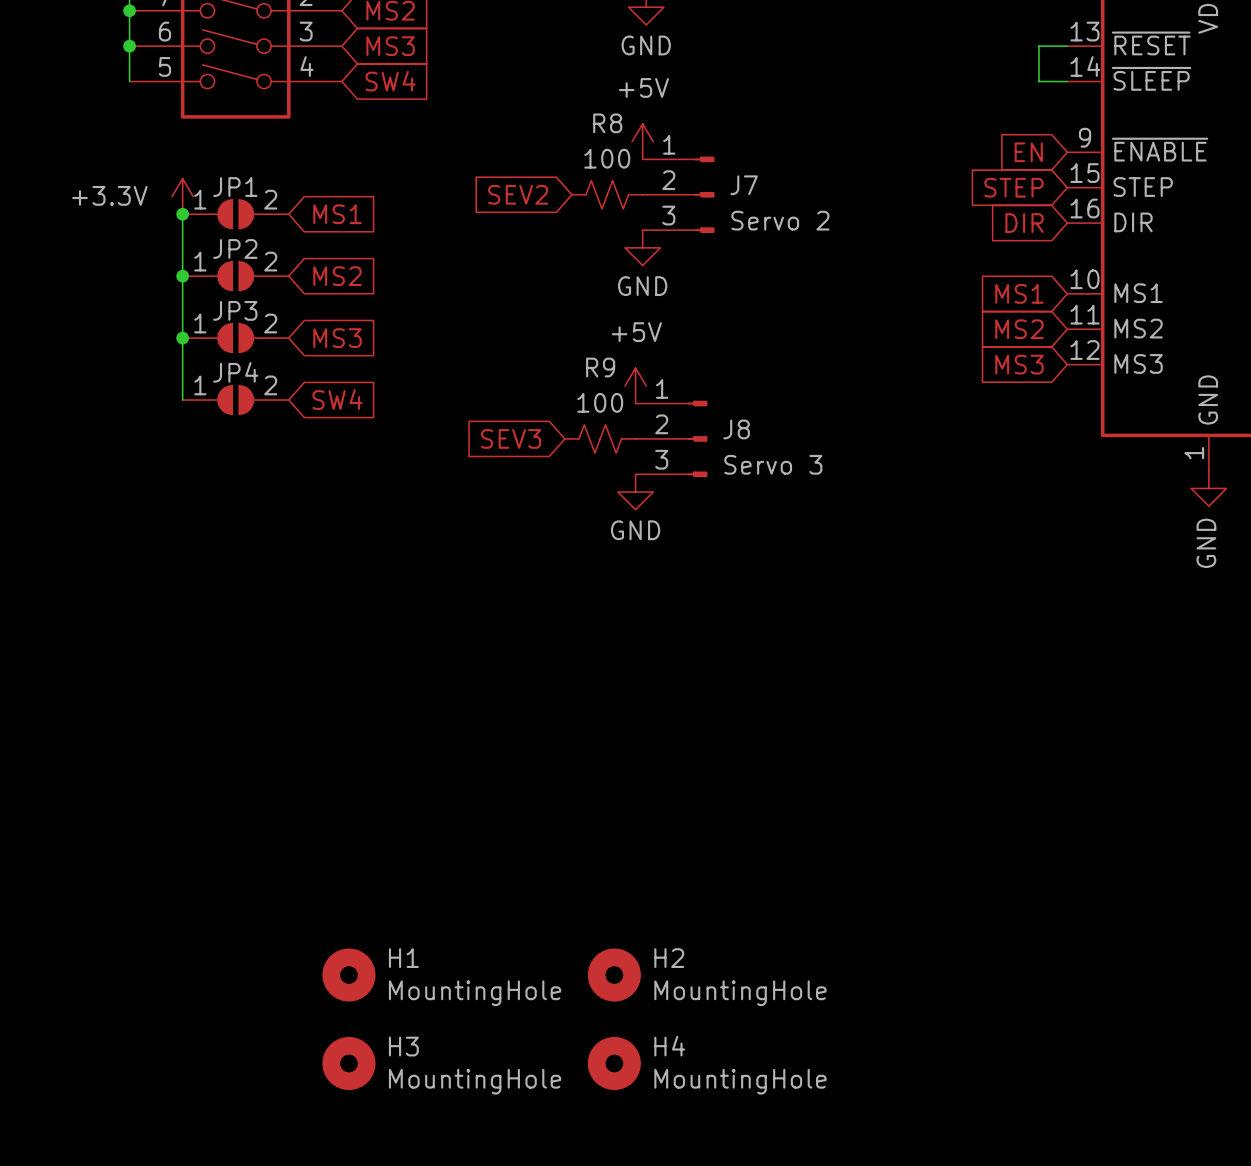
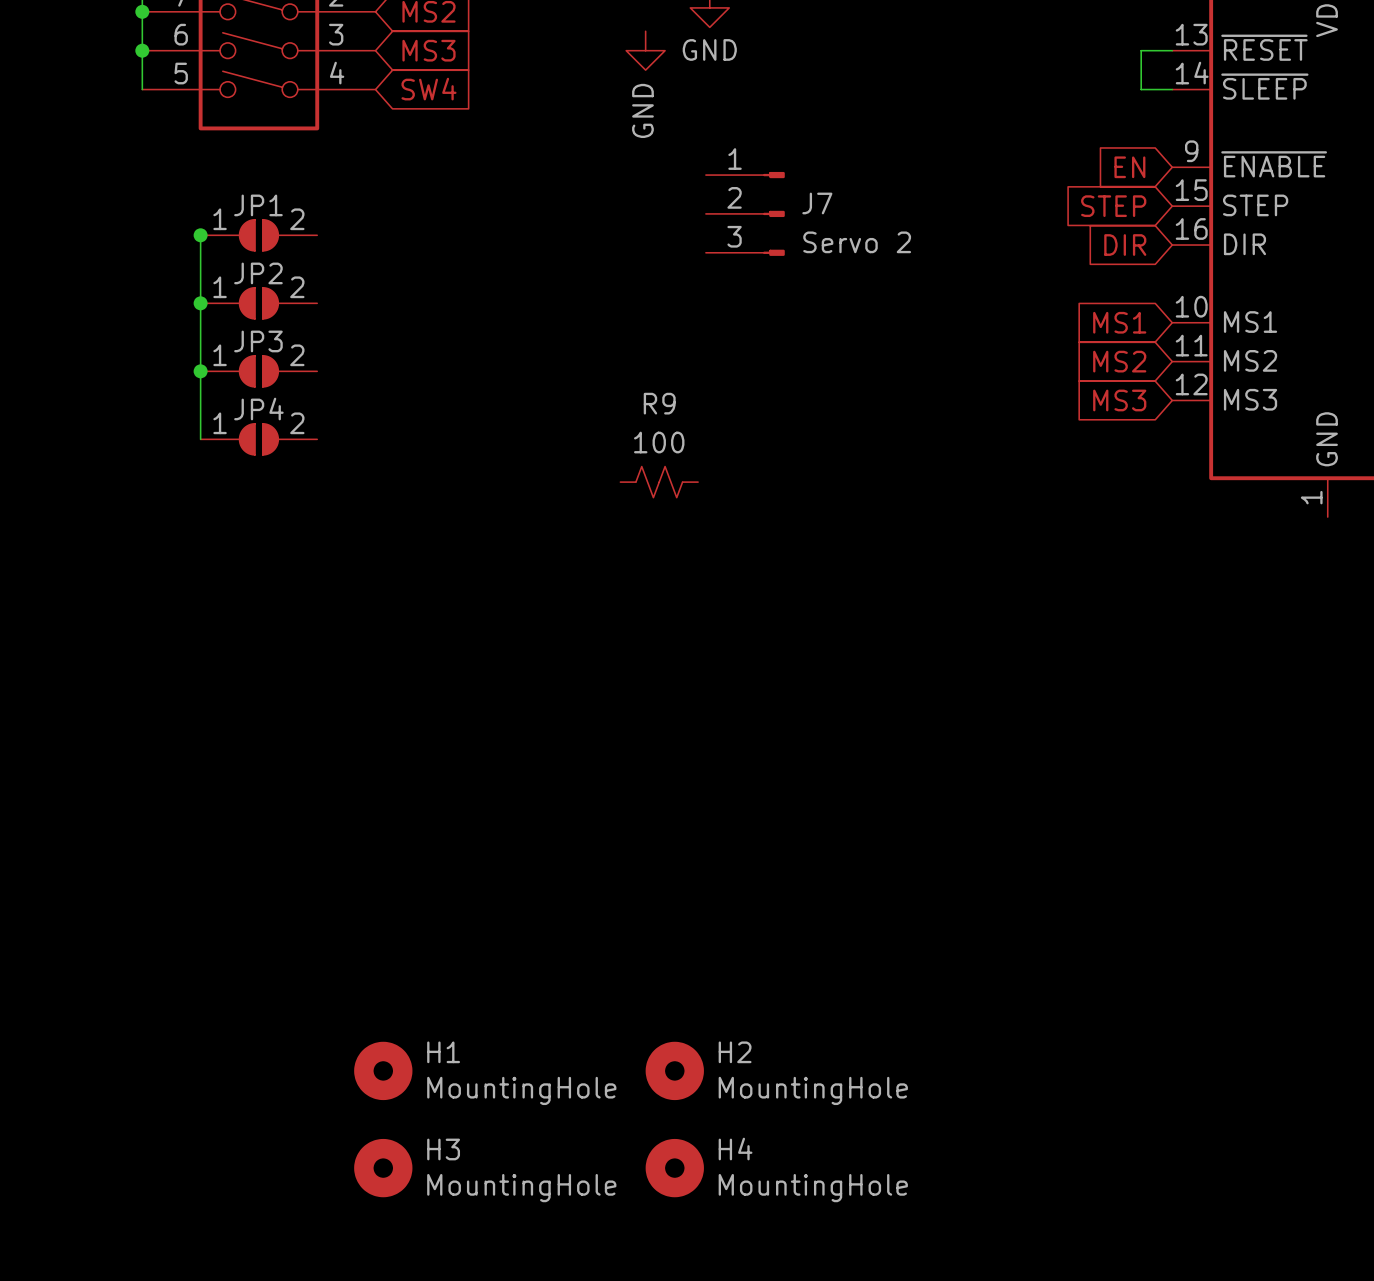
power symbol: +5V (642, 141) -> none
global label: SEV2 (518, 194) -> none
R8: 100 (607, 194) -> none
power symbol: +3.3V (182, 196) -> none
global label: MS1 (337, 214) -> none
power symbol position: GND (642, 247) -> GND (645, 50)
global label: MS2 (337, 276) -> none
power symbol text rotation: 0° (642, 286) -> 90° counterclockwise (642, 110)
global label: MS3 (337, 338) -> none
power symbol: +5V (635, 385) -> none
global label: SW4 (337, 399) -> none
global label: SEV3 (511, 438) -> none
J8: Servo 3 (671, 438) -> none
power symbol: GND (1208, 488) -> none
power symbol: GND (635, 492) -> none

